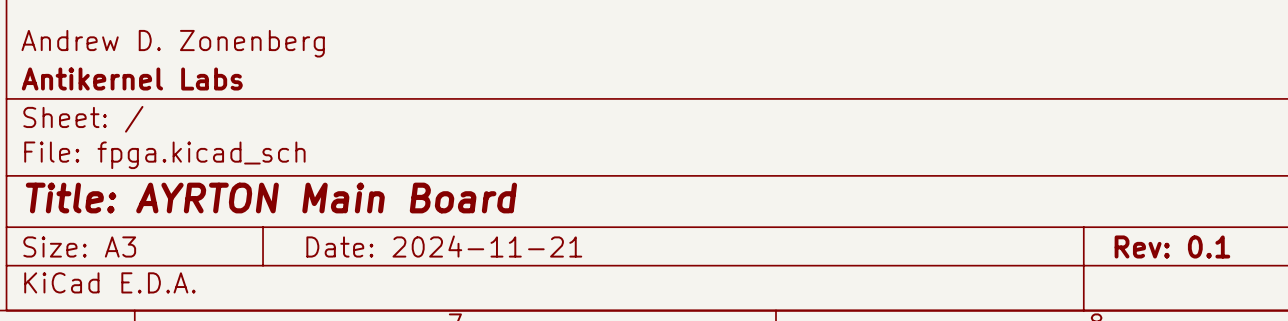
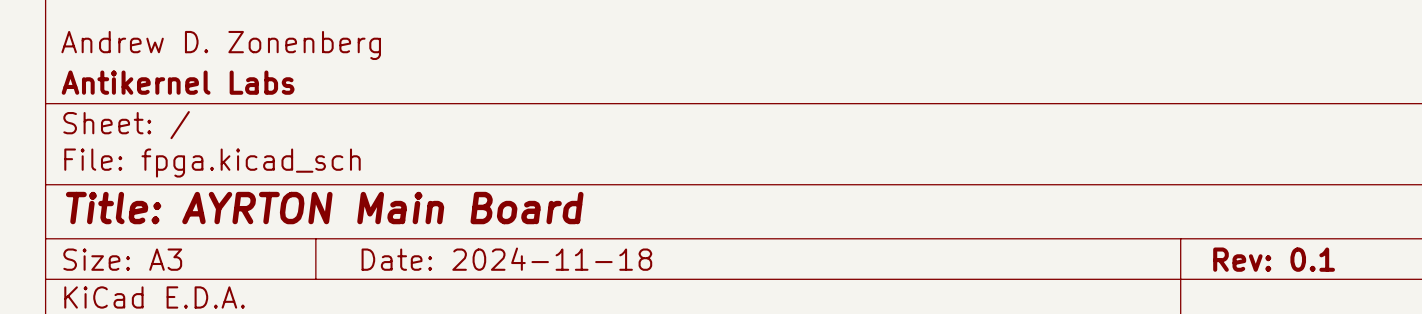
title block: Date: 2024-11-21 (444, 246) -> Date: 2024-11-18 (506, 259)

